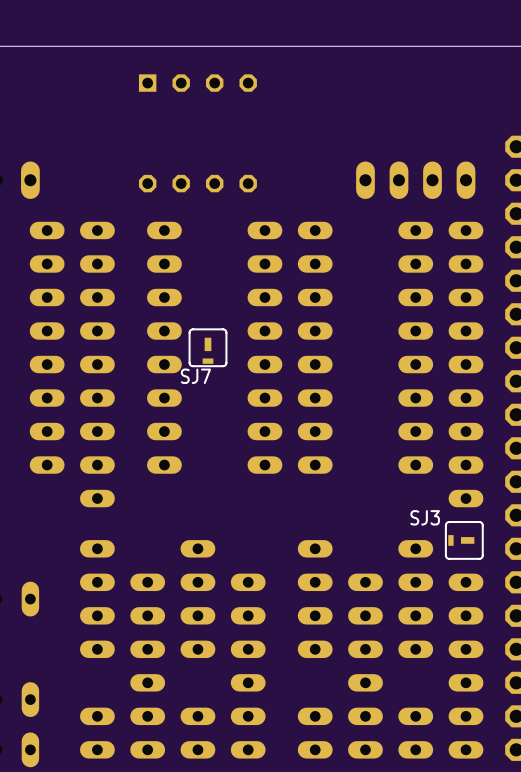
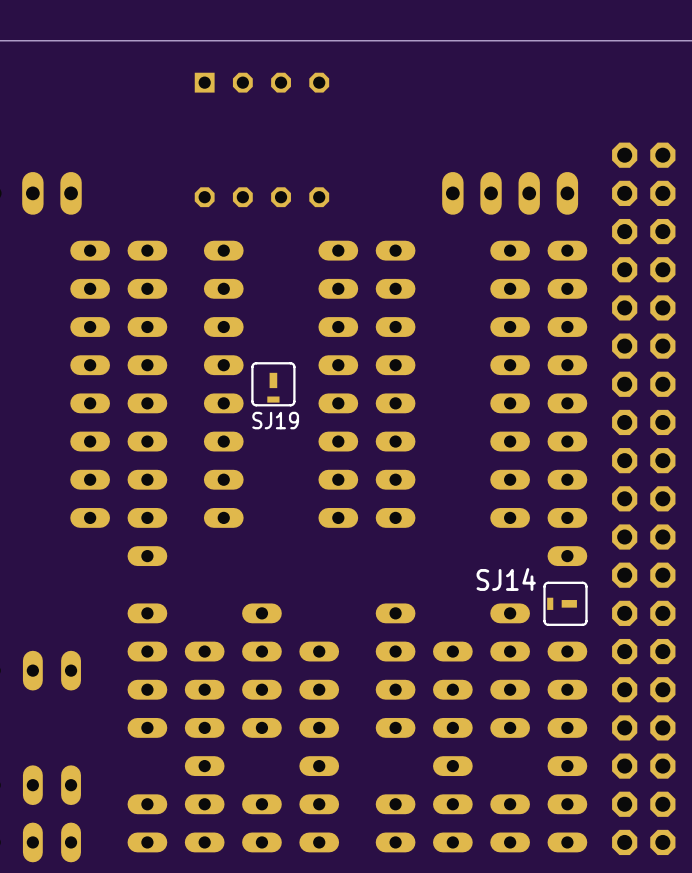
SJ7 name: SJ7 (195, 376) -> SJ19 (275, 420)
SJ3 name: SJ3 (425, 517) -> SJ14 (506, 579)

